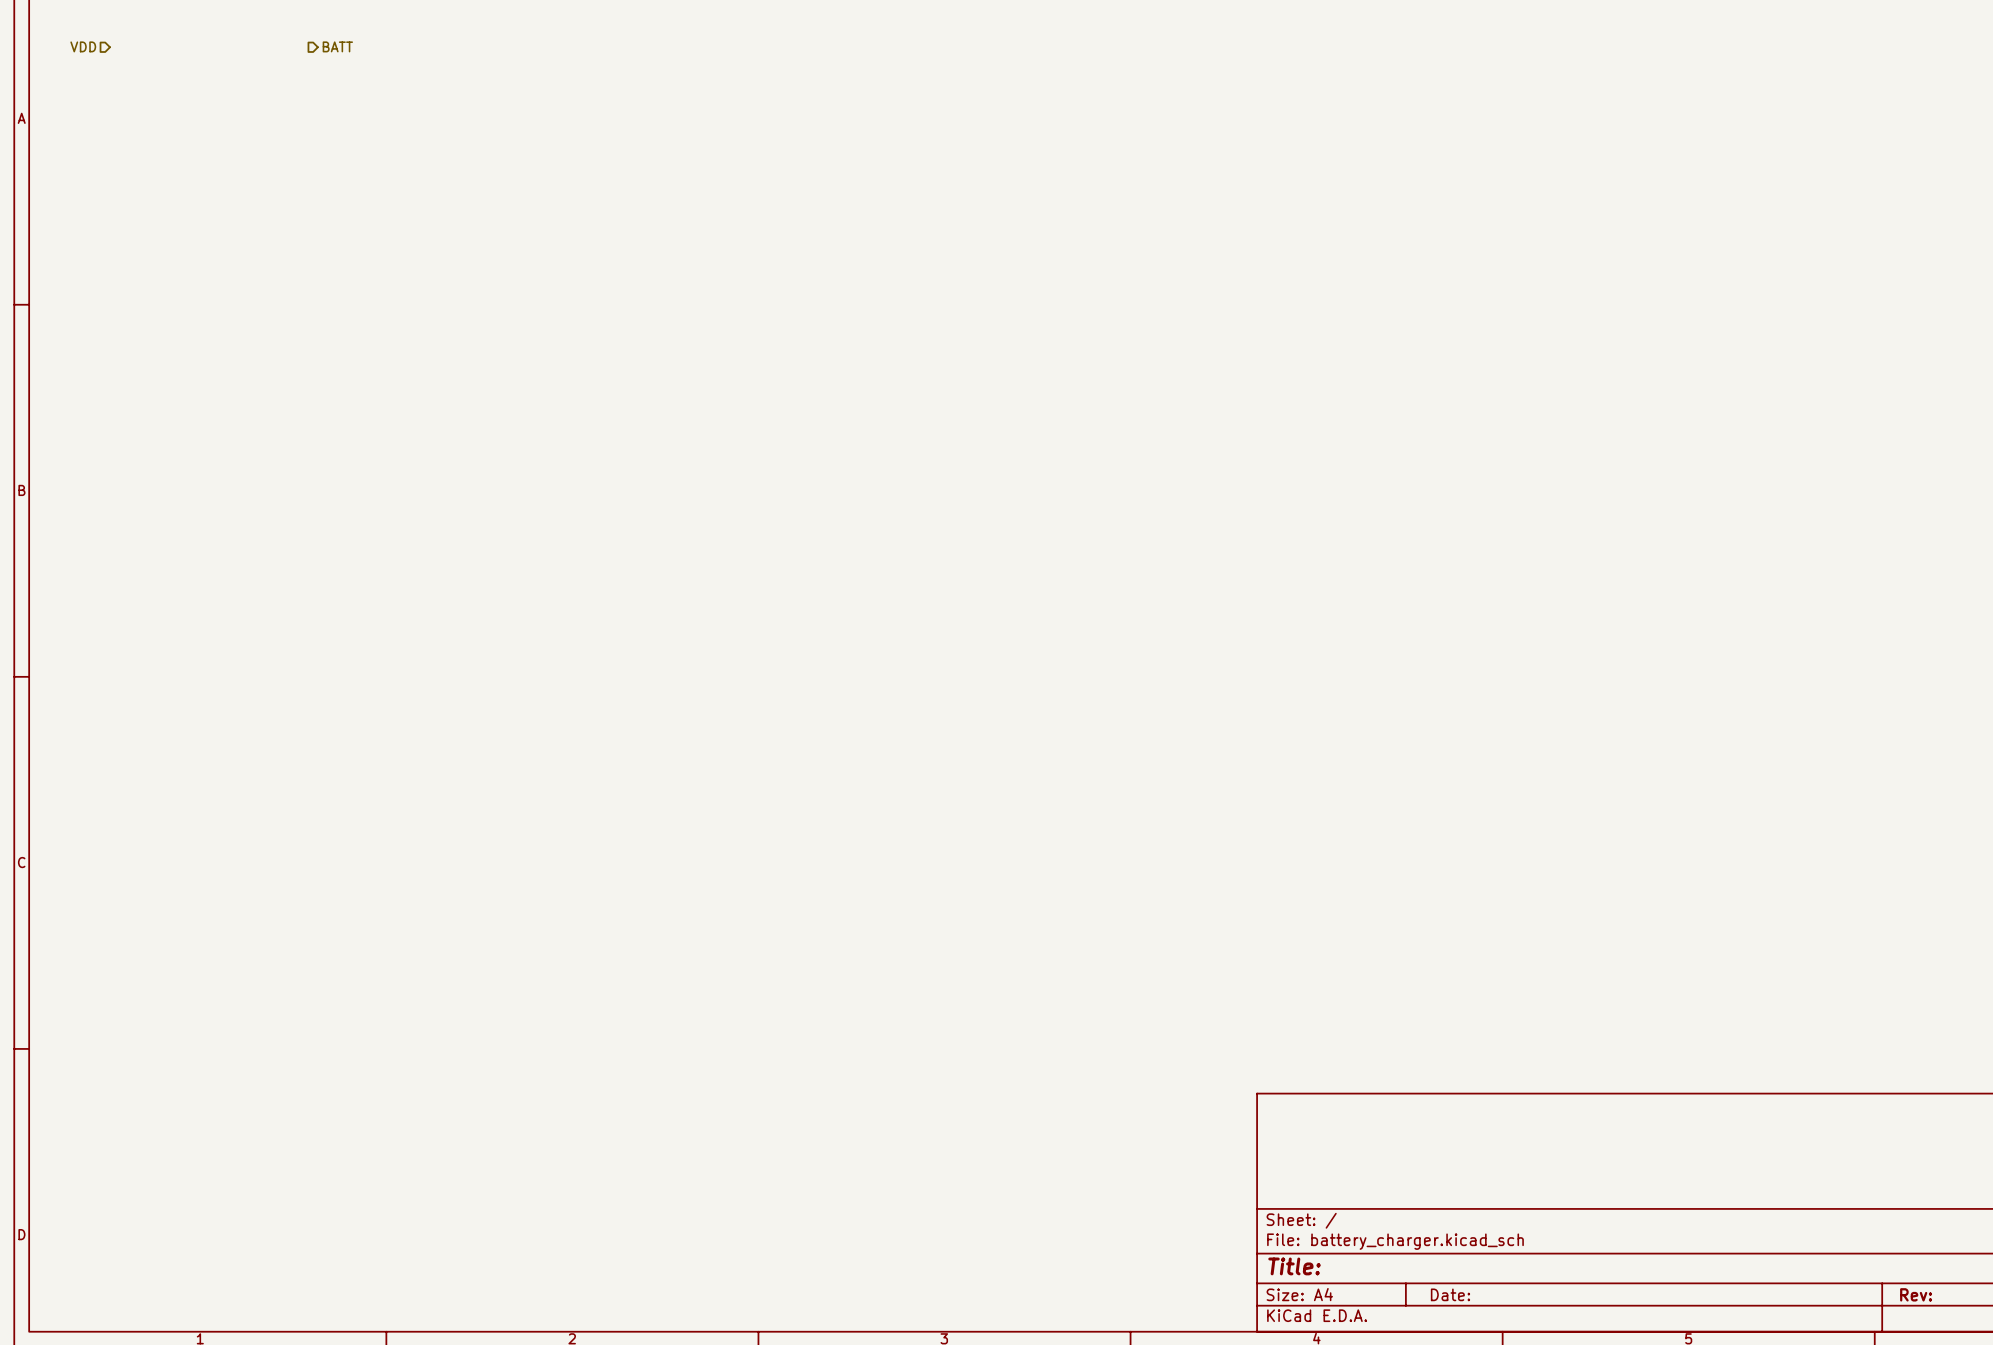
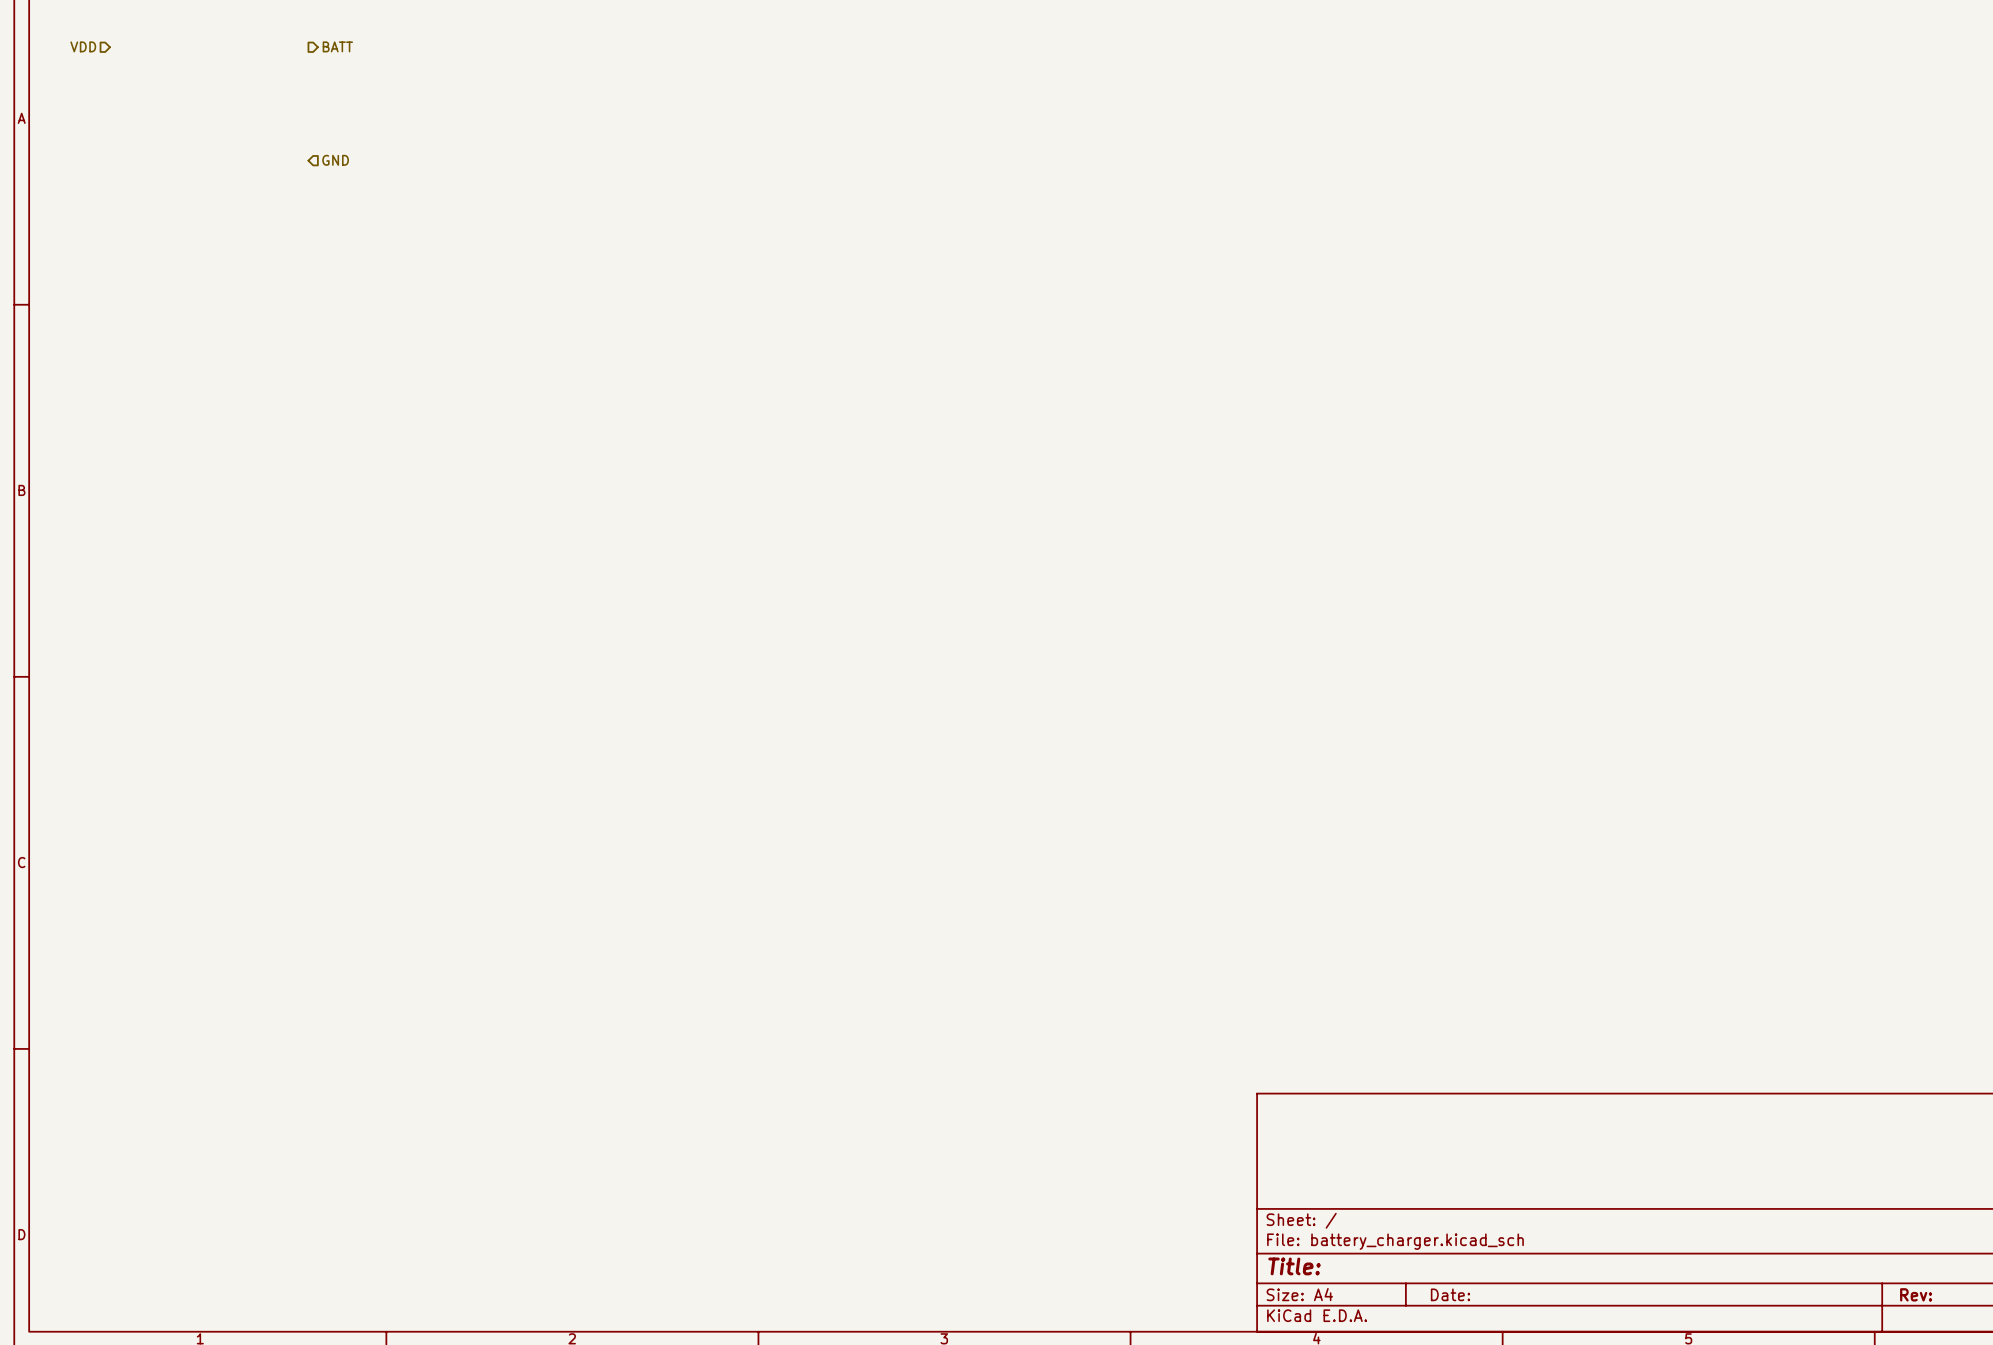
hierarchical label: none -> GND (335, 160)

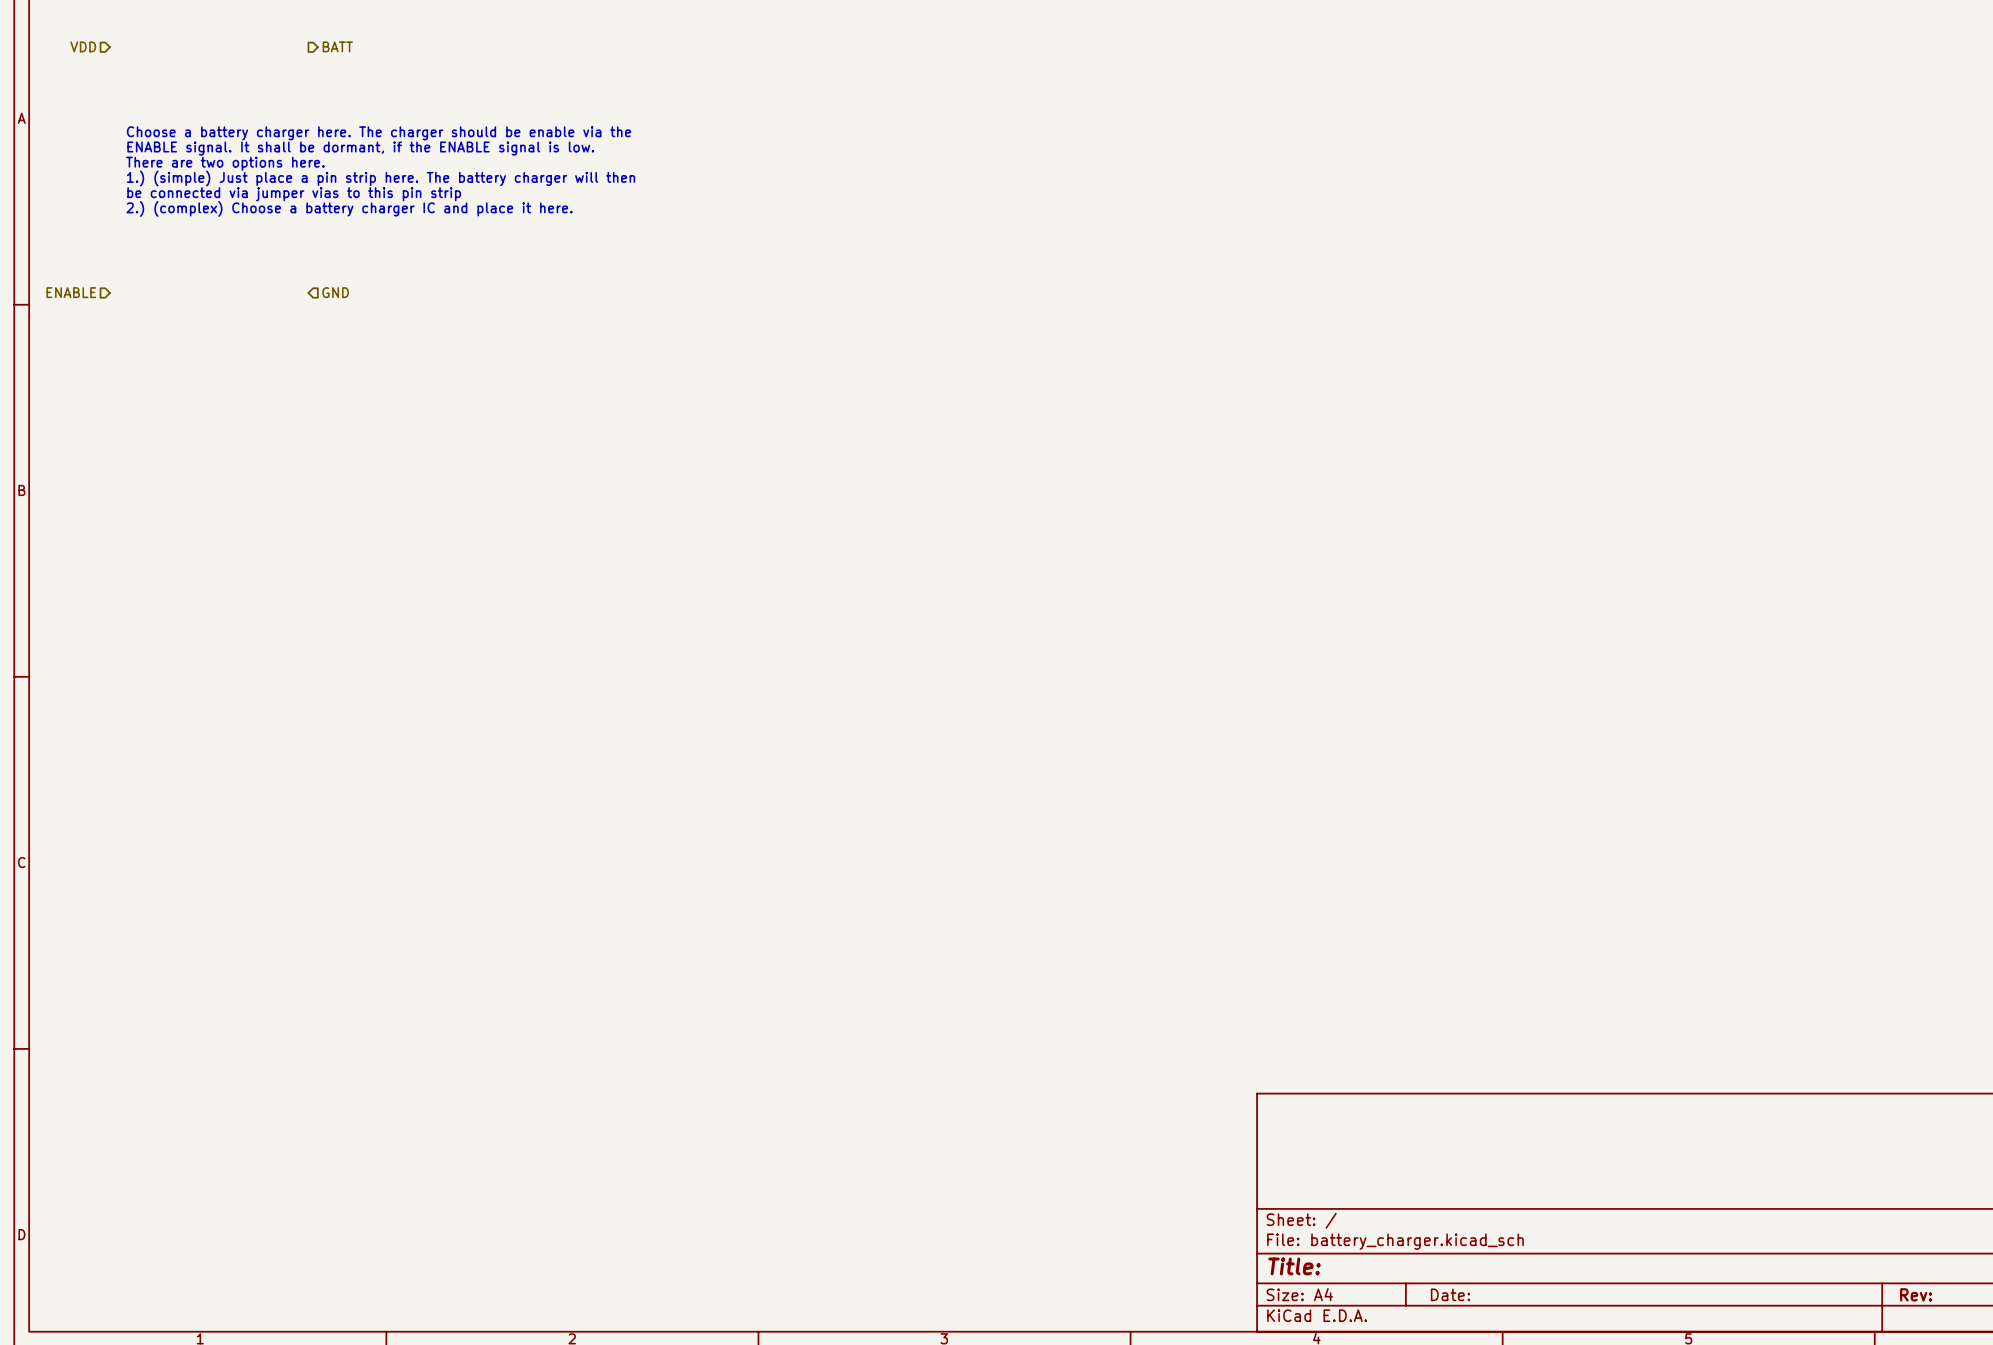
text: none -> Choose a battery charger here. The charger should be enable via the (378, 133)
text: none -> ENABLE signal. It shall be dormant, if the ENABLE signal is low. (360, 148)
hierarchical label position: GND (335, 160) -> GND (335, 292)
text: none -> There are two options here. (225, 163)
text: none -> 1.) (simple) Just place a pin strip here. The battery charger will then (381, 178)
text: none -> be connected via jumper vias to this pin strip (294, 194)
text: none -> 2.) (complex) Choose a battery charger IC and place it here. (349, 208)
hierarchical label: none -> ENABLE (71, 292)

